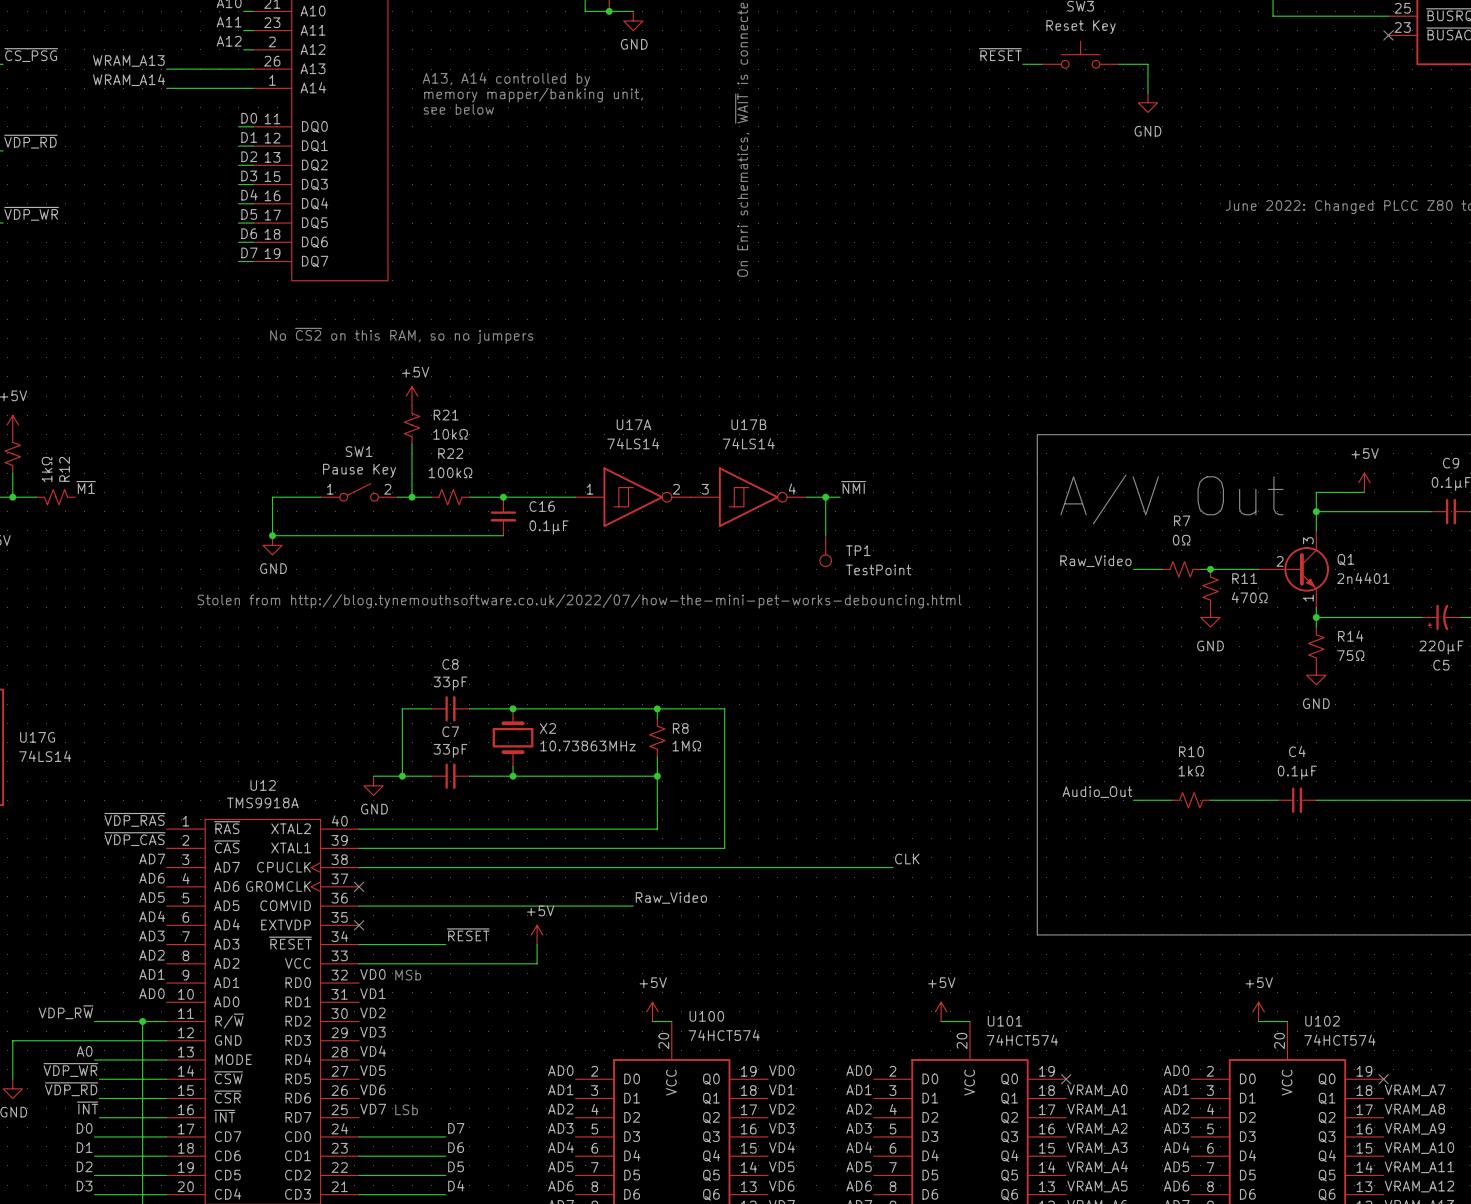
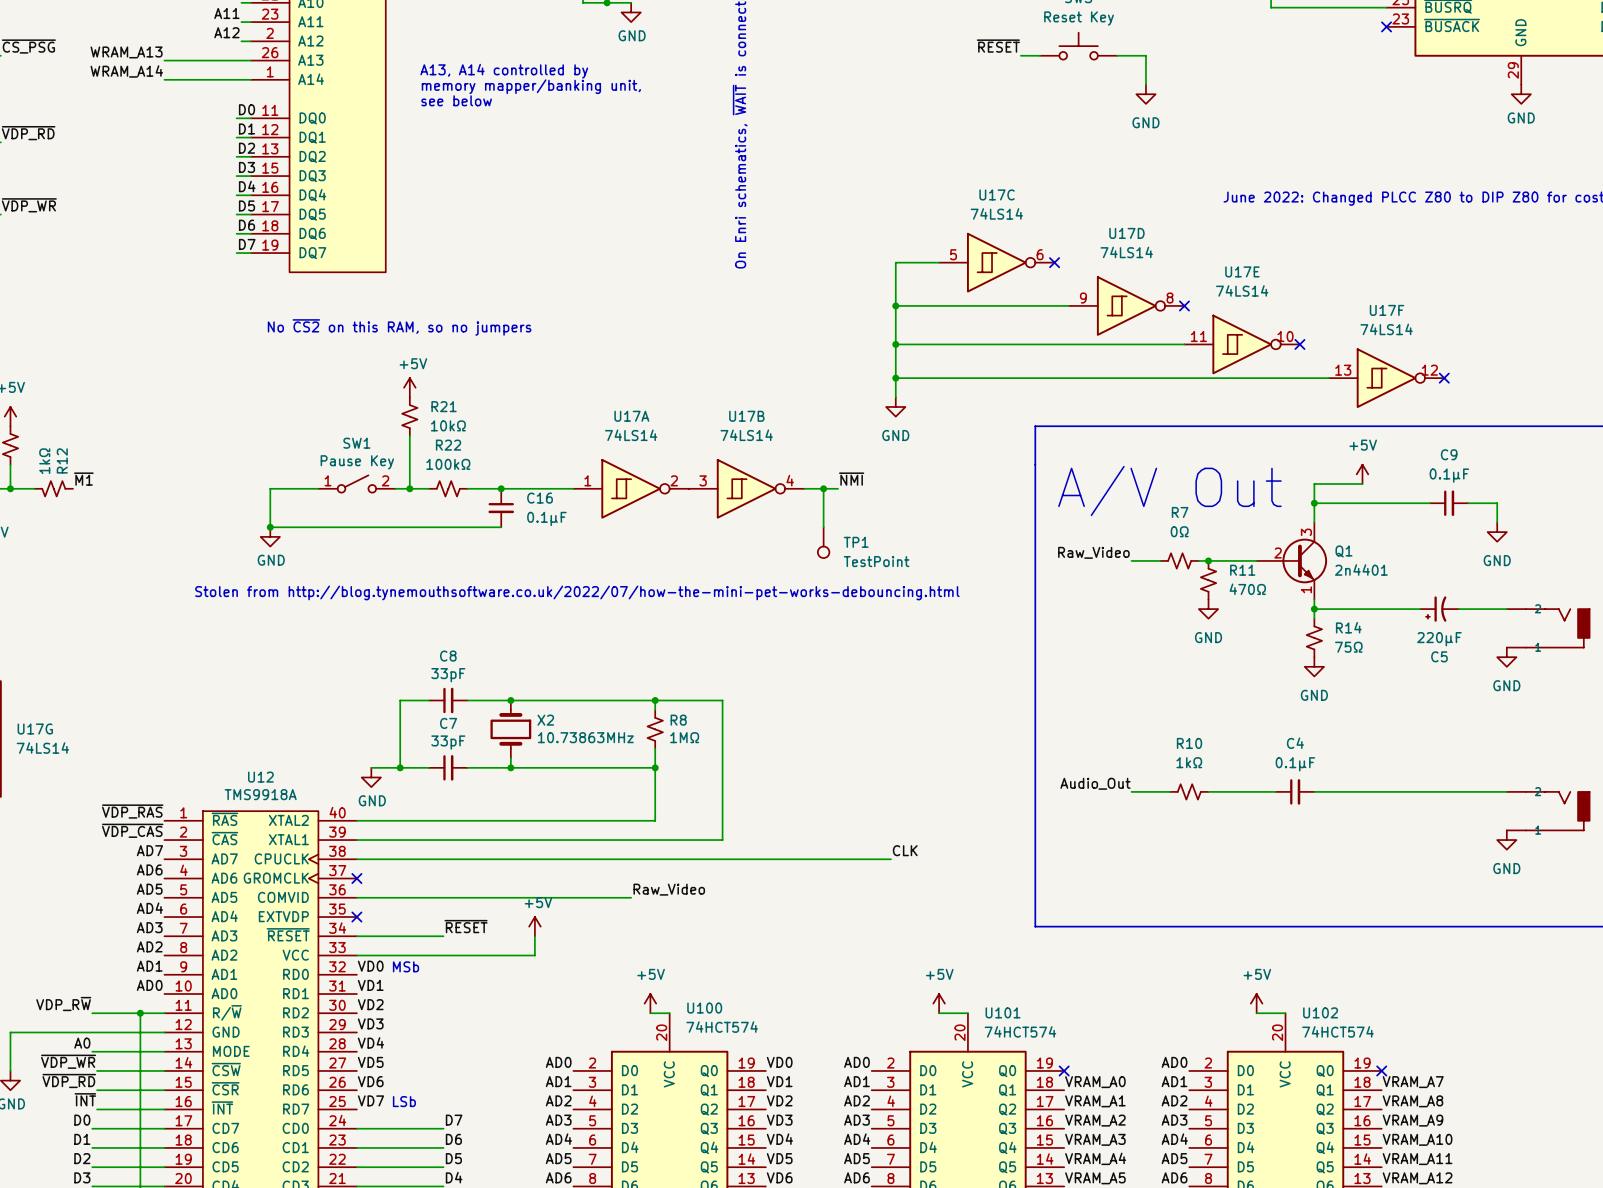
wire: none -> (939, 262) (895, 262) (895, 397)
U17C: none -> 74LS14 (996, 262)
no-connect mark: none -> (1054, 262)
wire: none -> (895, 305) (1068, 305)
junction: none -> (895, 305)
U17D: none -> 74LS14 (1126, 305)
no-connect mark: none -> (1184, 305)
wire: none -> (895, 344) (1184, 344)
junction: none -> (895, 344)
U17E: none -> 74LS14 (1242, 344)
no-connect mark: none -> (1299, 344)
wire: none -> (895, 378) (1328, 378)
junction: none -> (895, 378)
U17F: none -> 74LS14 (1386, 378)
no-connect mark: none -> (1444, 378)
power symbol: none -> GND (895, 407)

